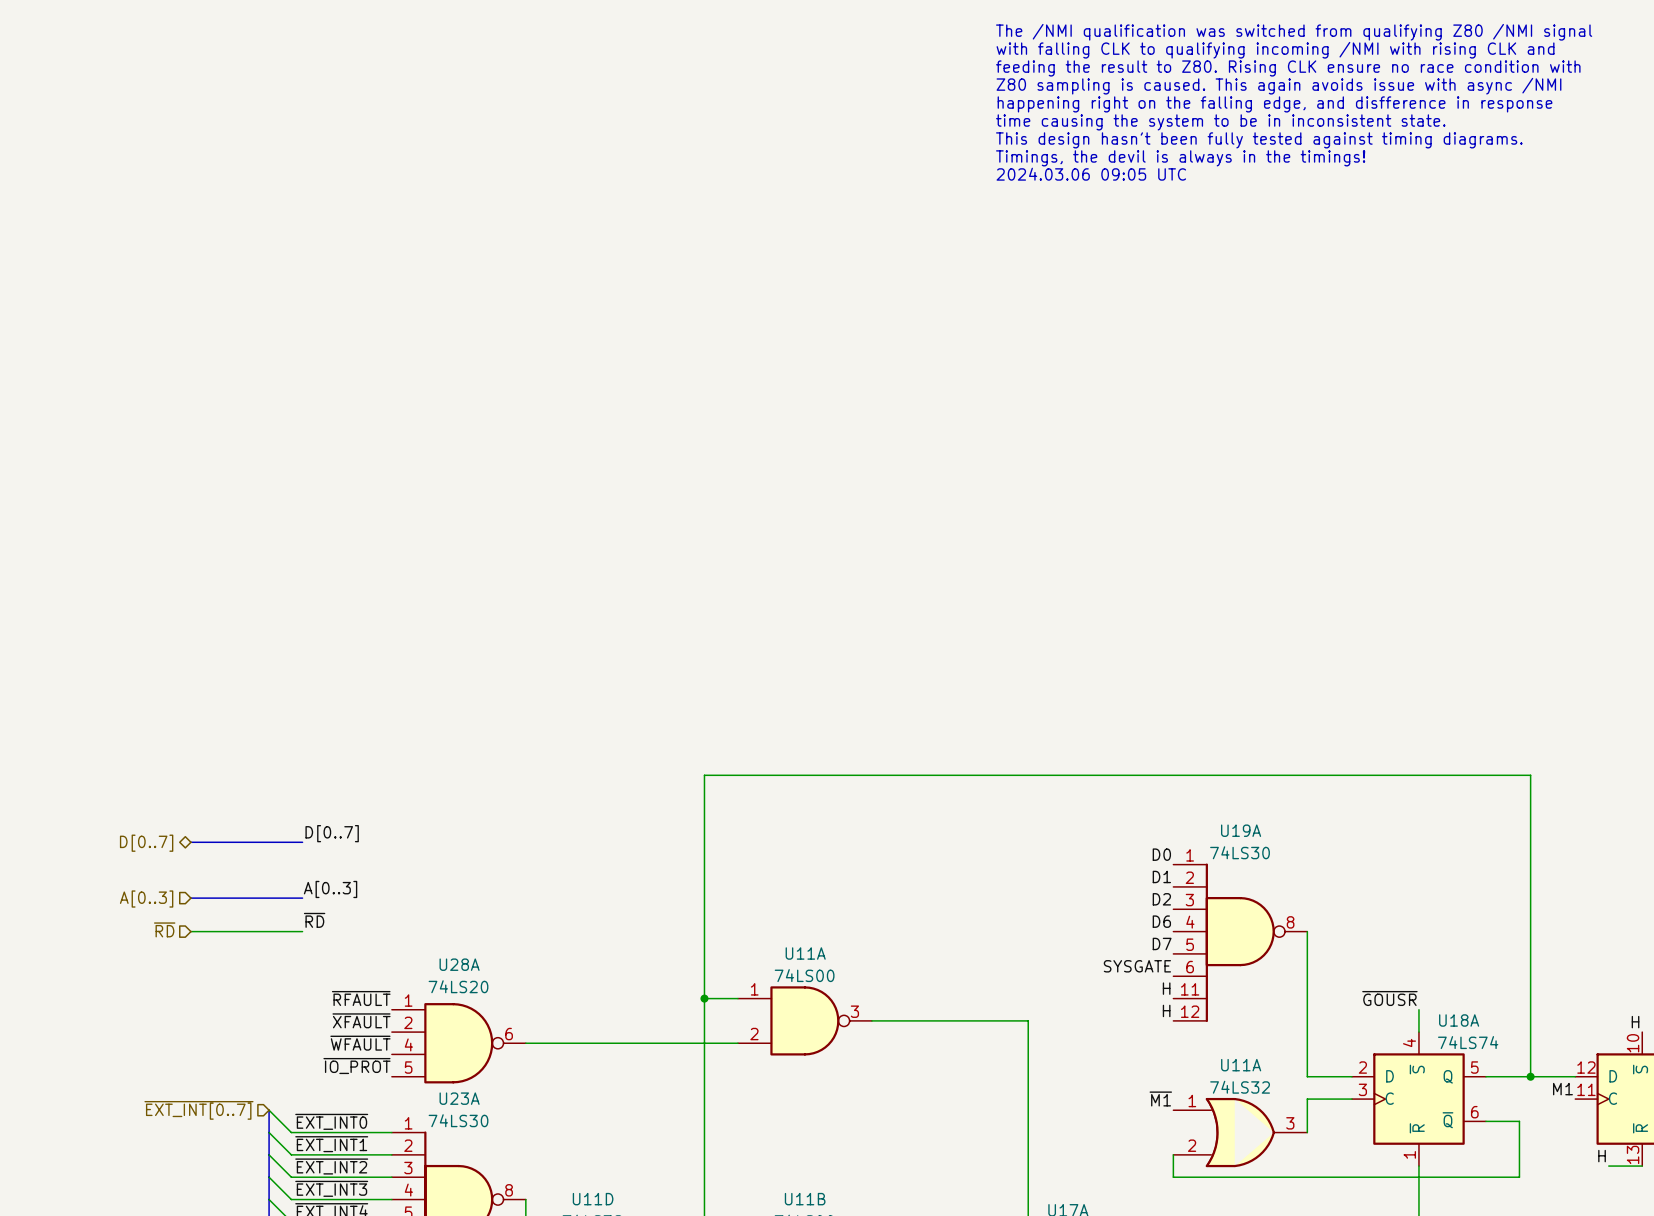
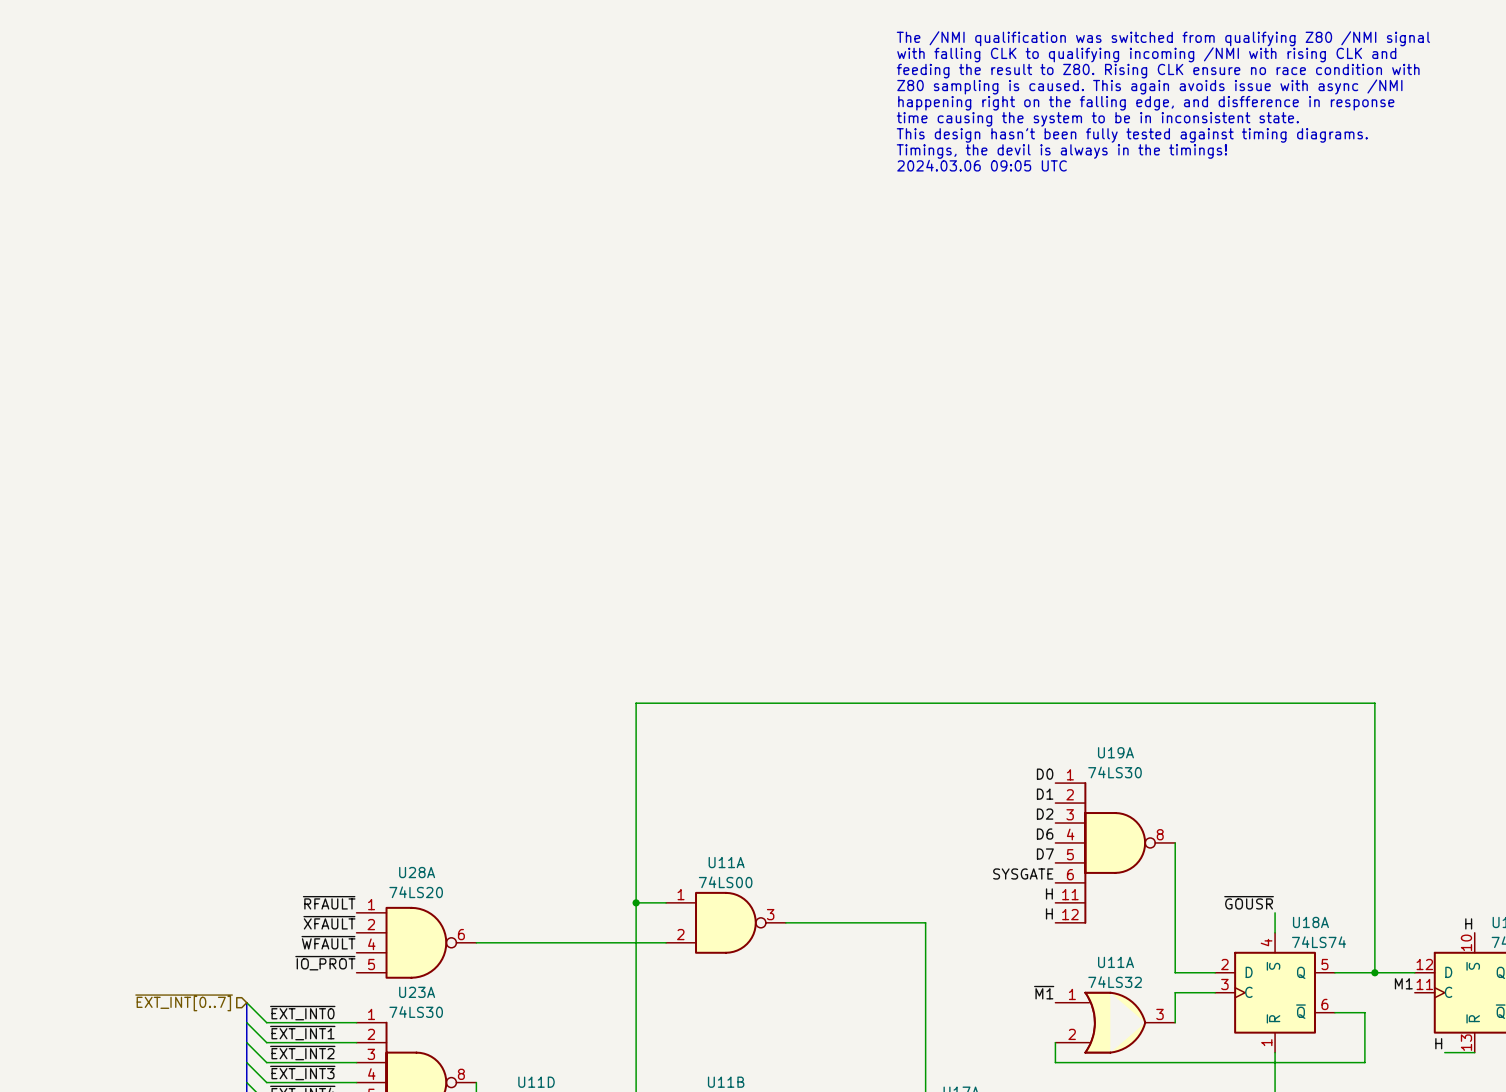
label: D[0..7] (332, 833) -> none
bus: (190, 842) (302, 842) -> none
hierarchical label: D[0..7] (146, 843) -> none
label: A[0..3] (330, 889) -> none
bus: (190, 898) (302, 898) -> none
hierarchical label: A[0..3] (146, 899) -> none
label: ~{RD} (314, 920) -> none
hierarchical label: ~{RD} (164, 929) -> none
wire: (190, 931) (302, 931) -> none

